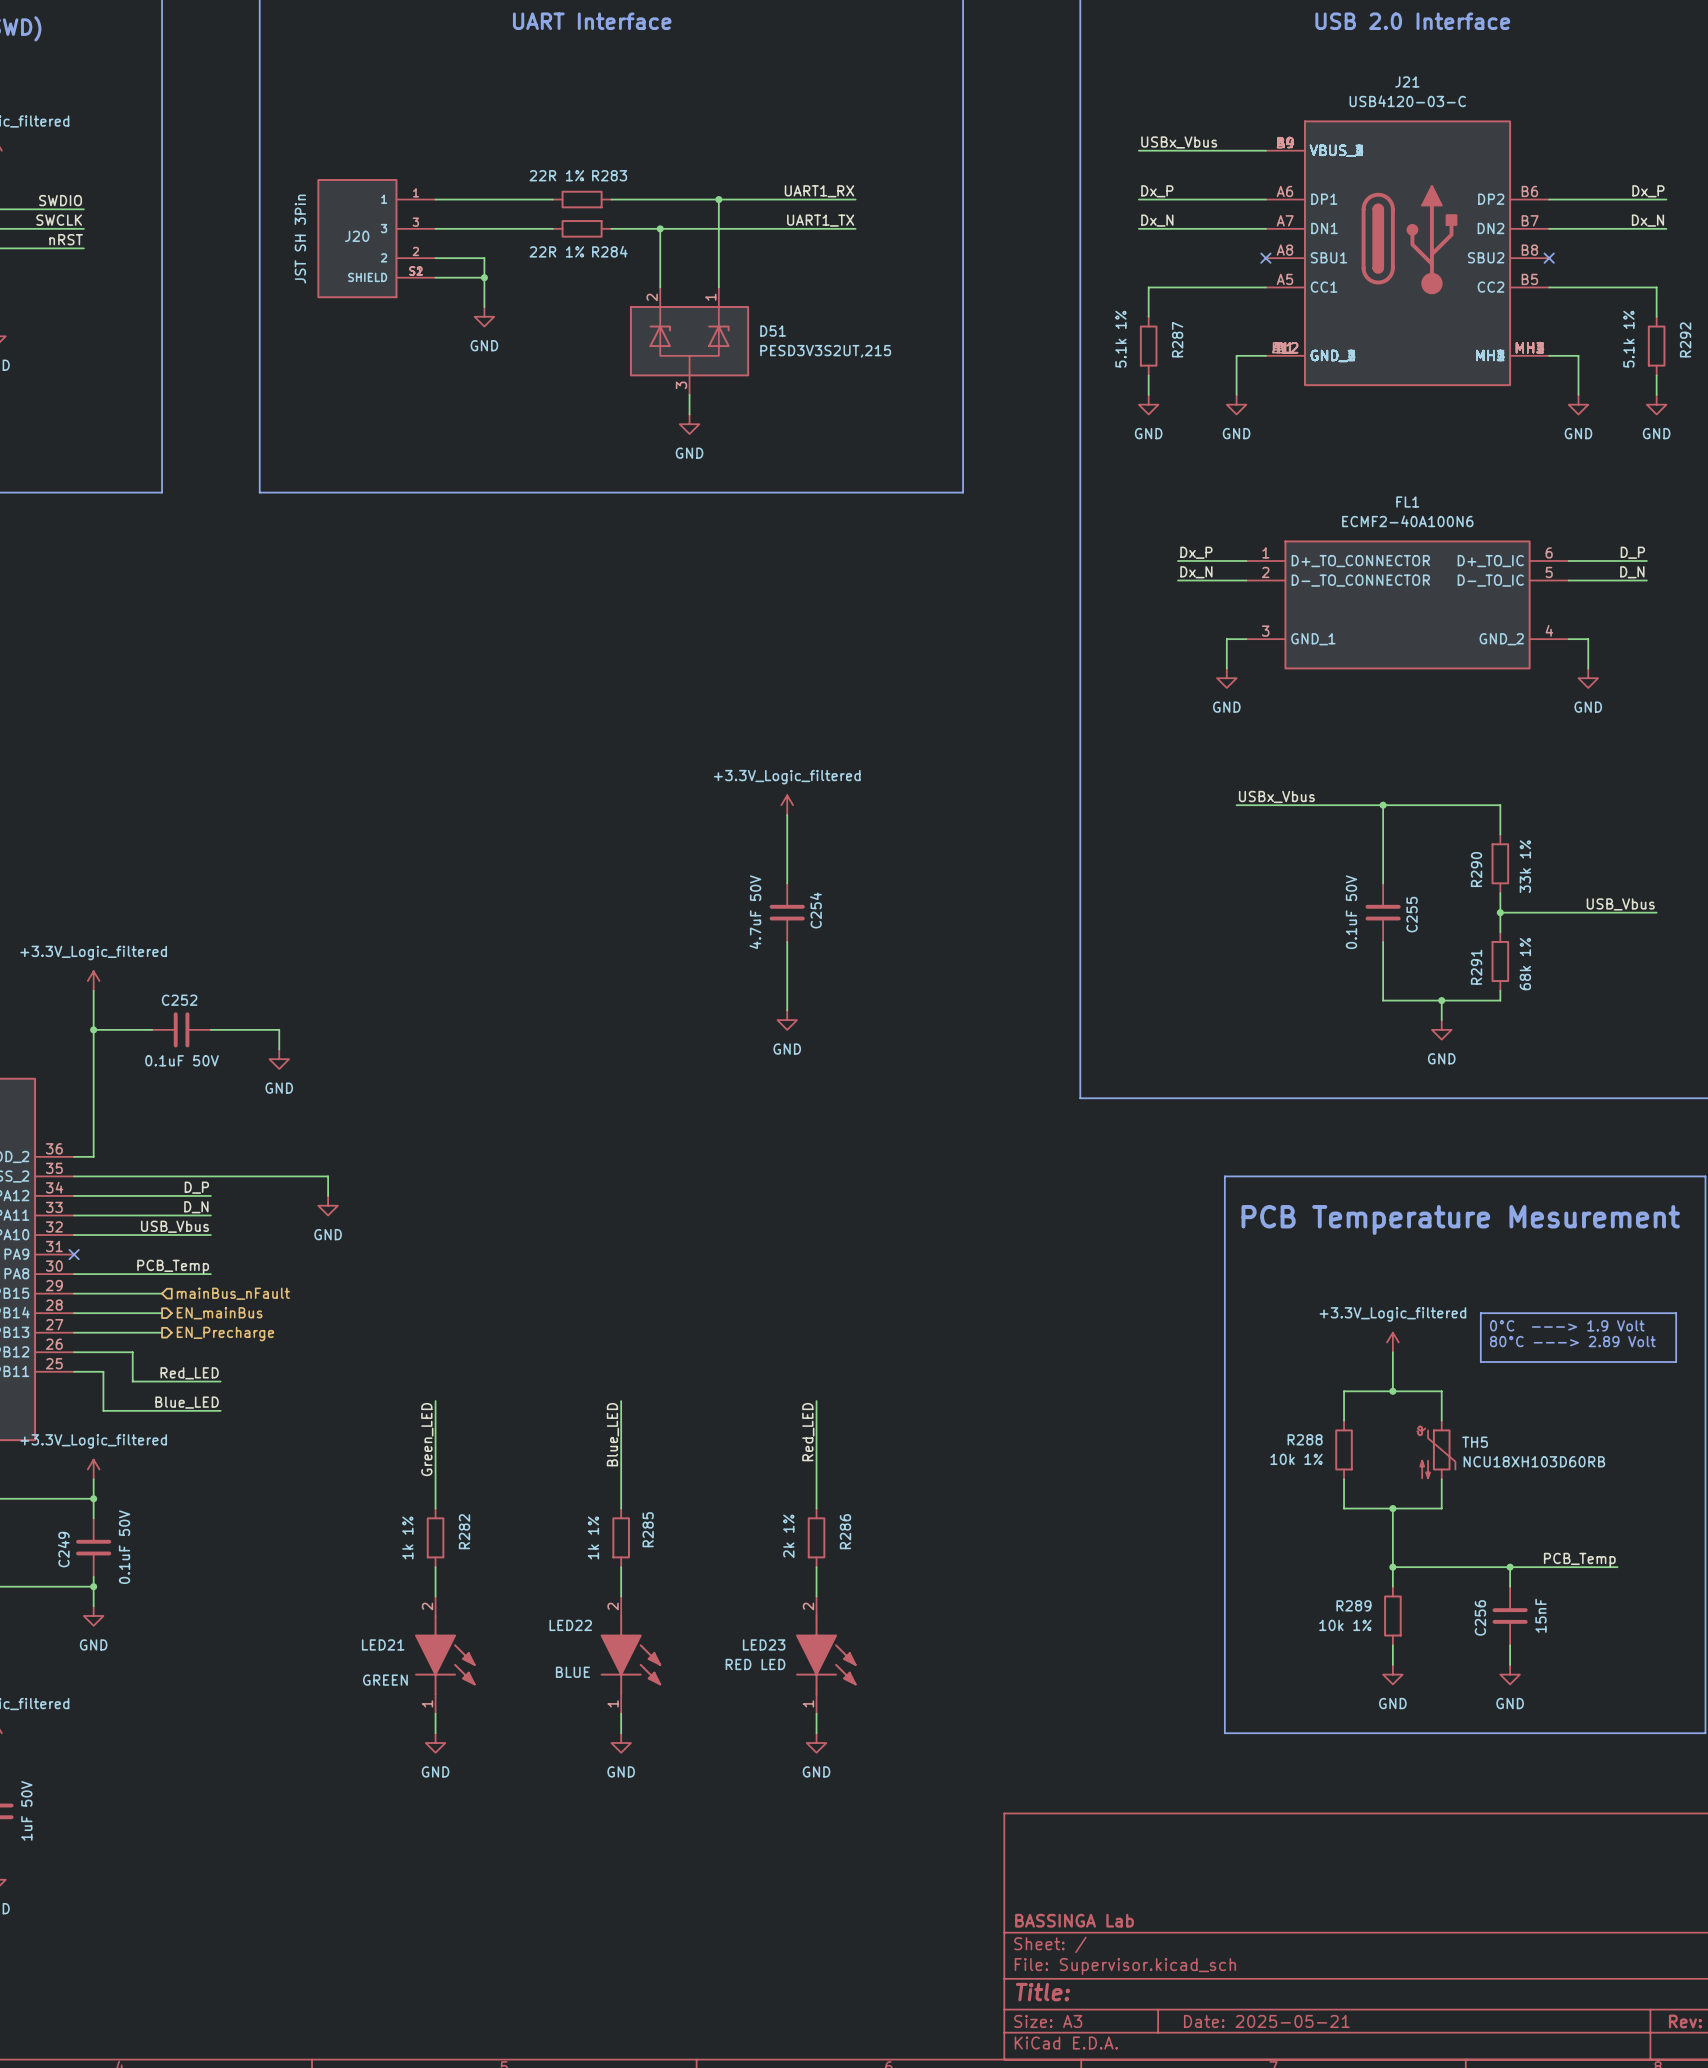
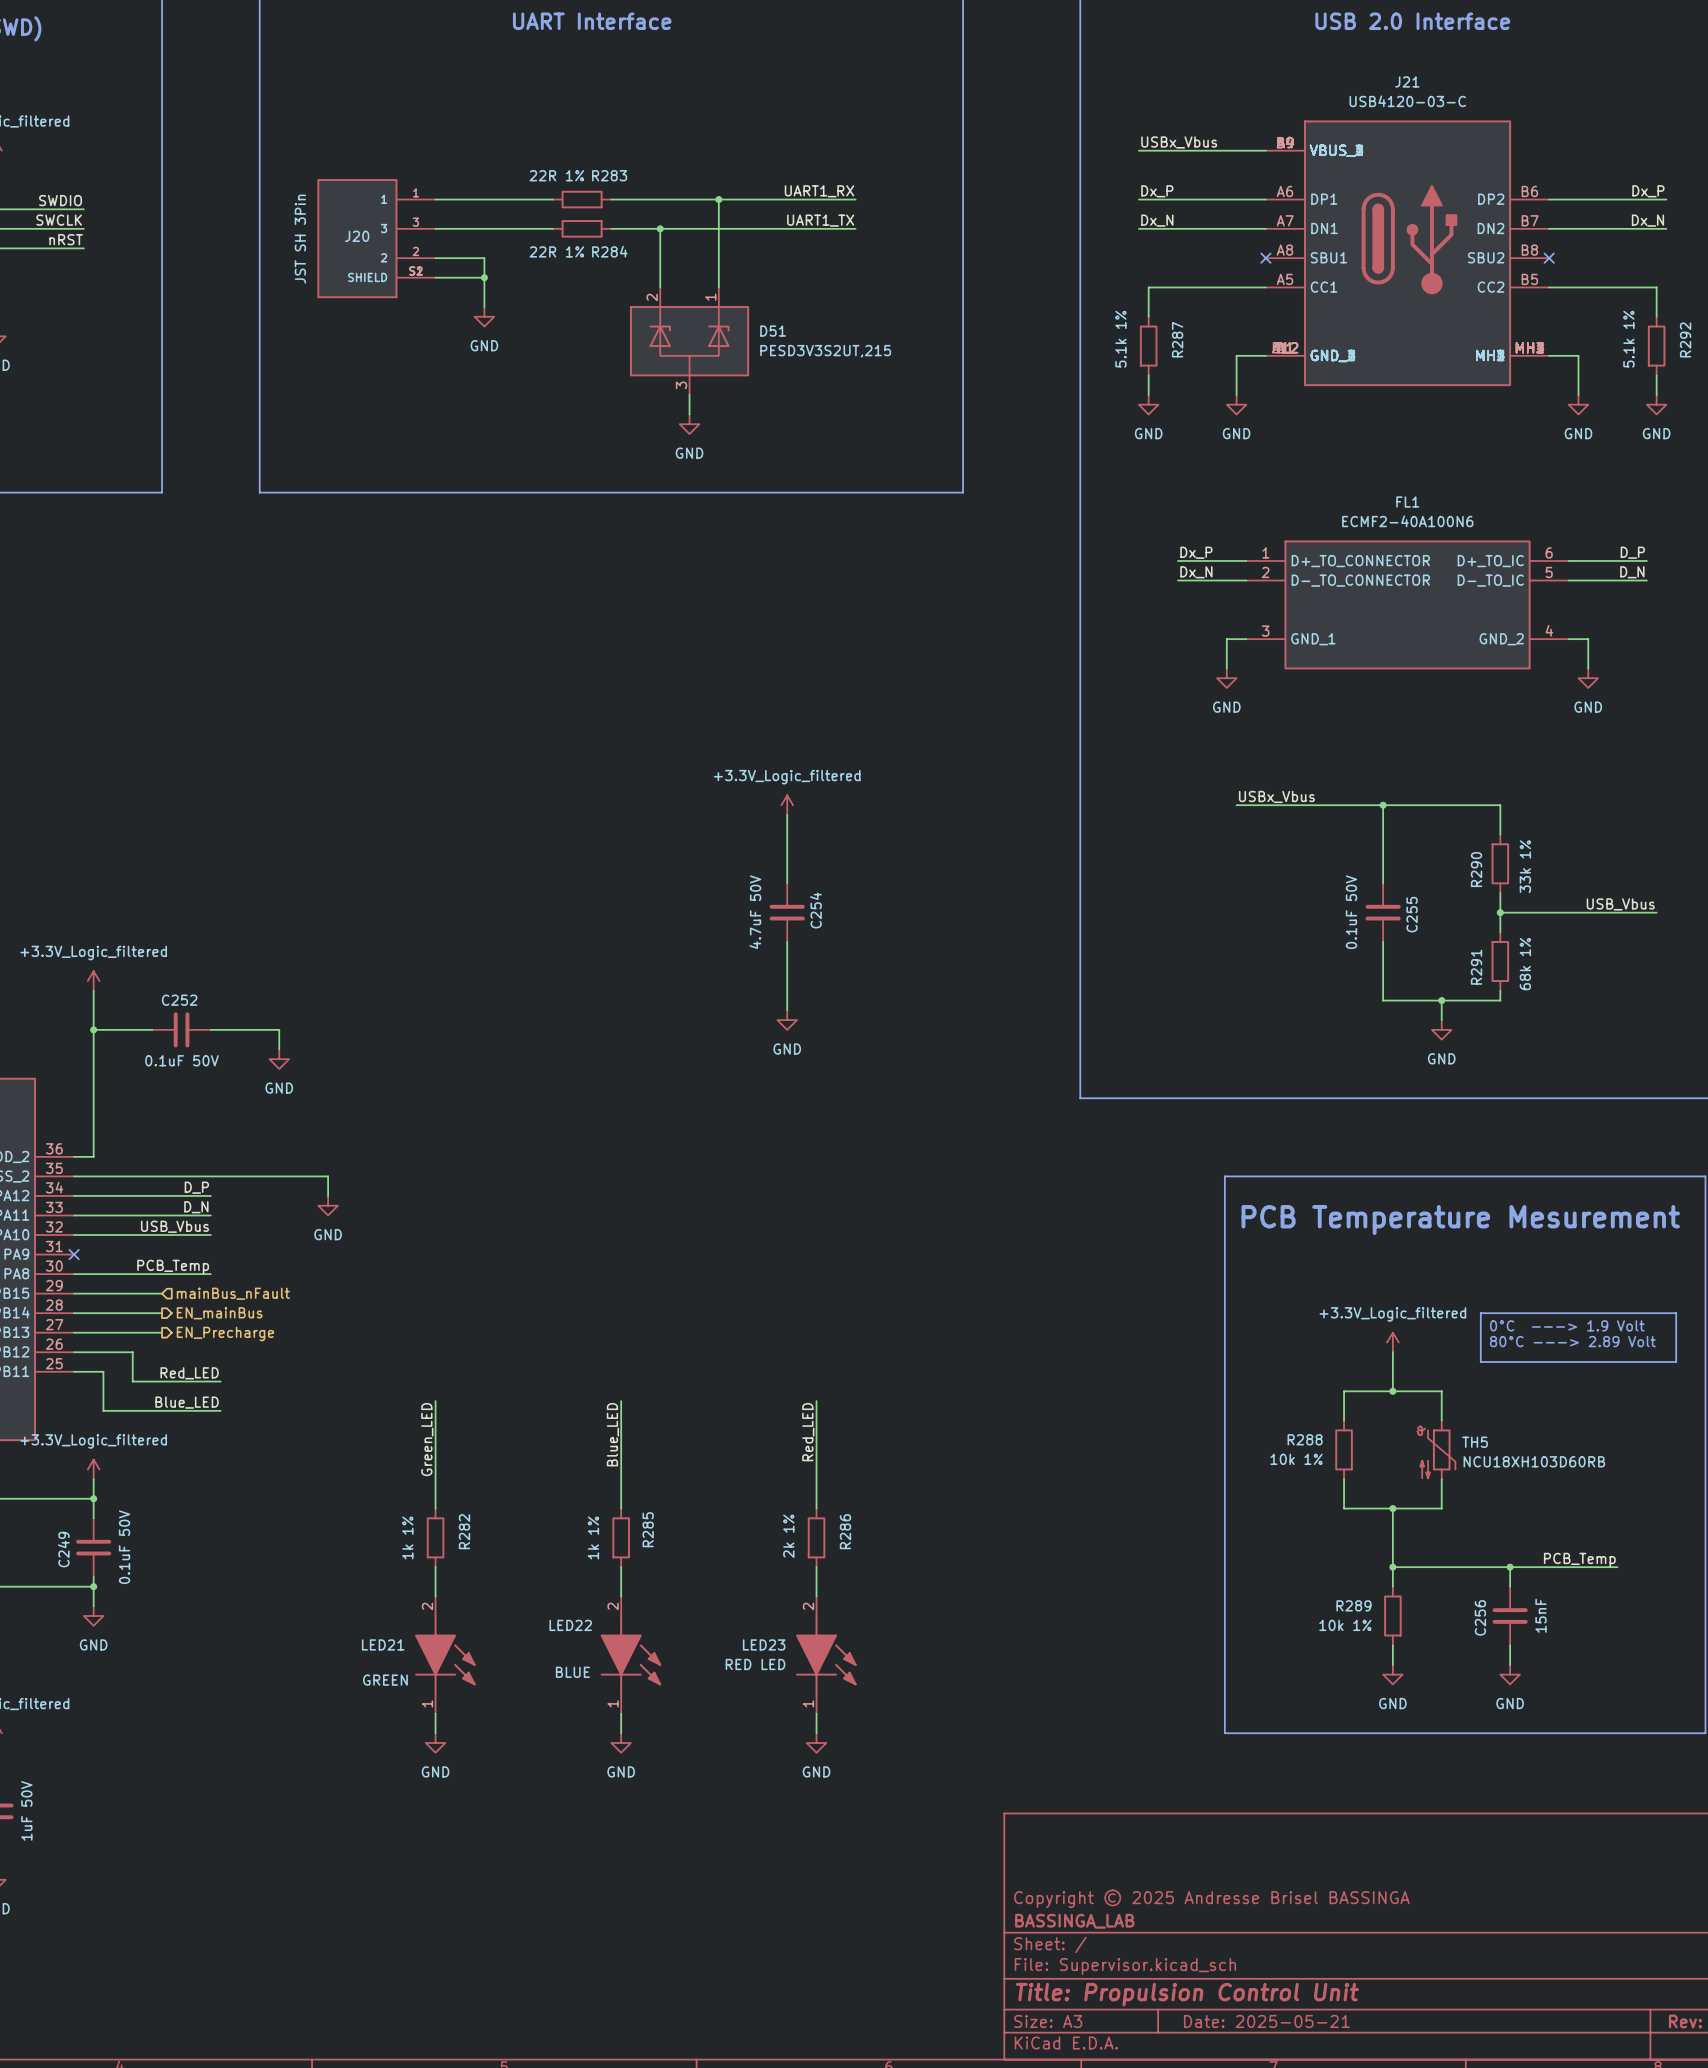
title block: none -> Copyright © 2025 Andresse Brisel BASSINGA (1211, 1898)
title block: BASSINGA Lab (1074, 1920) -> BASSINGA_LAB (1074, 1921)
title block: Title: (1042, 1992) -> Title: Propulsion Control Unit (1187, 1994)

